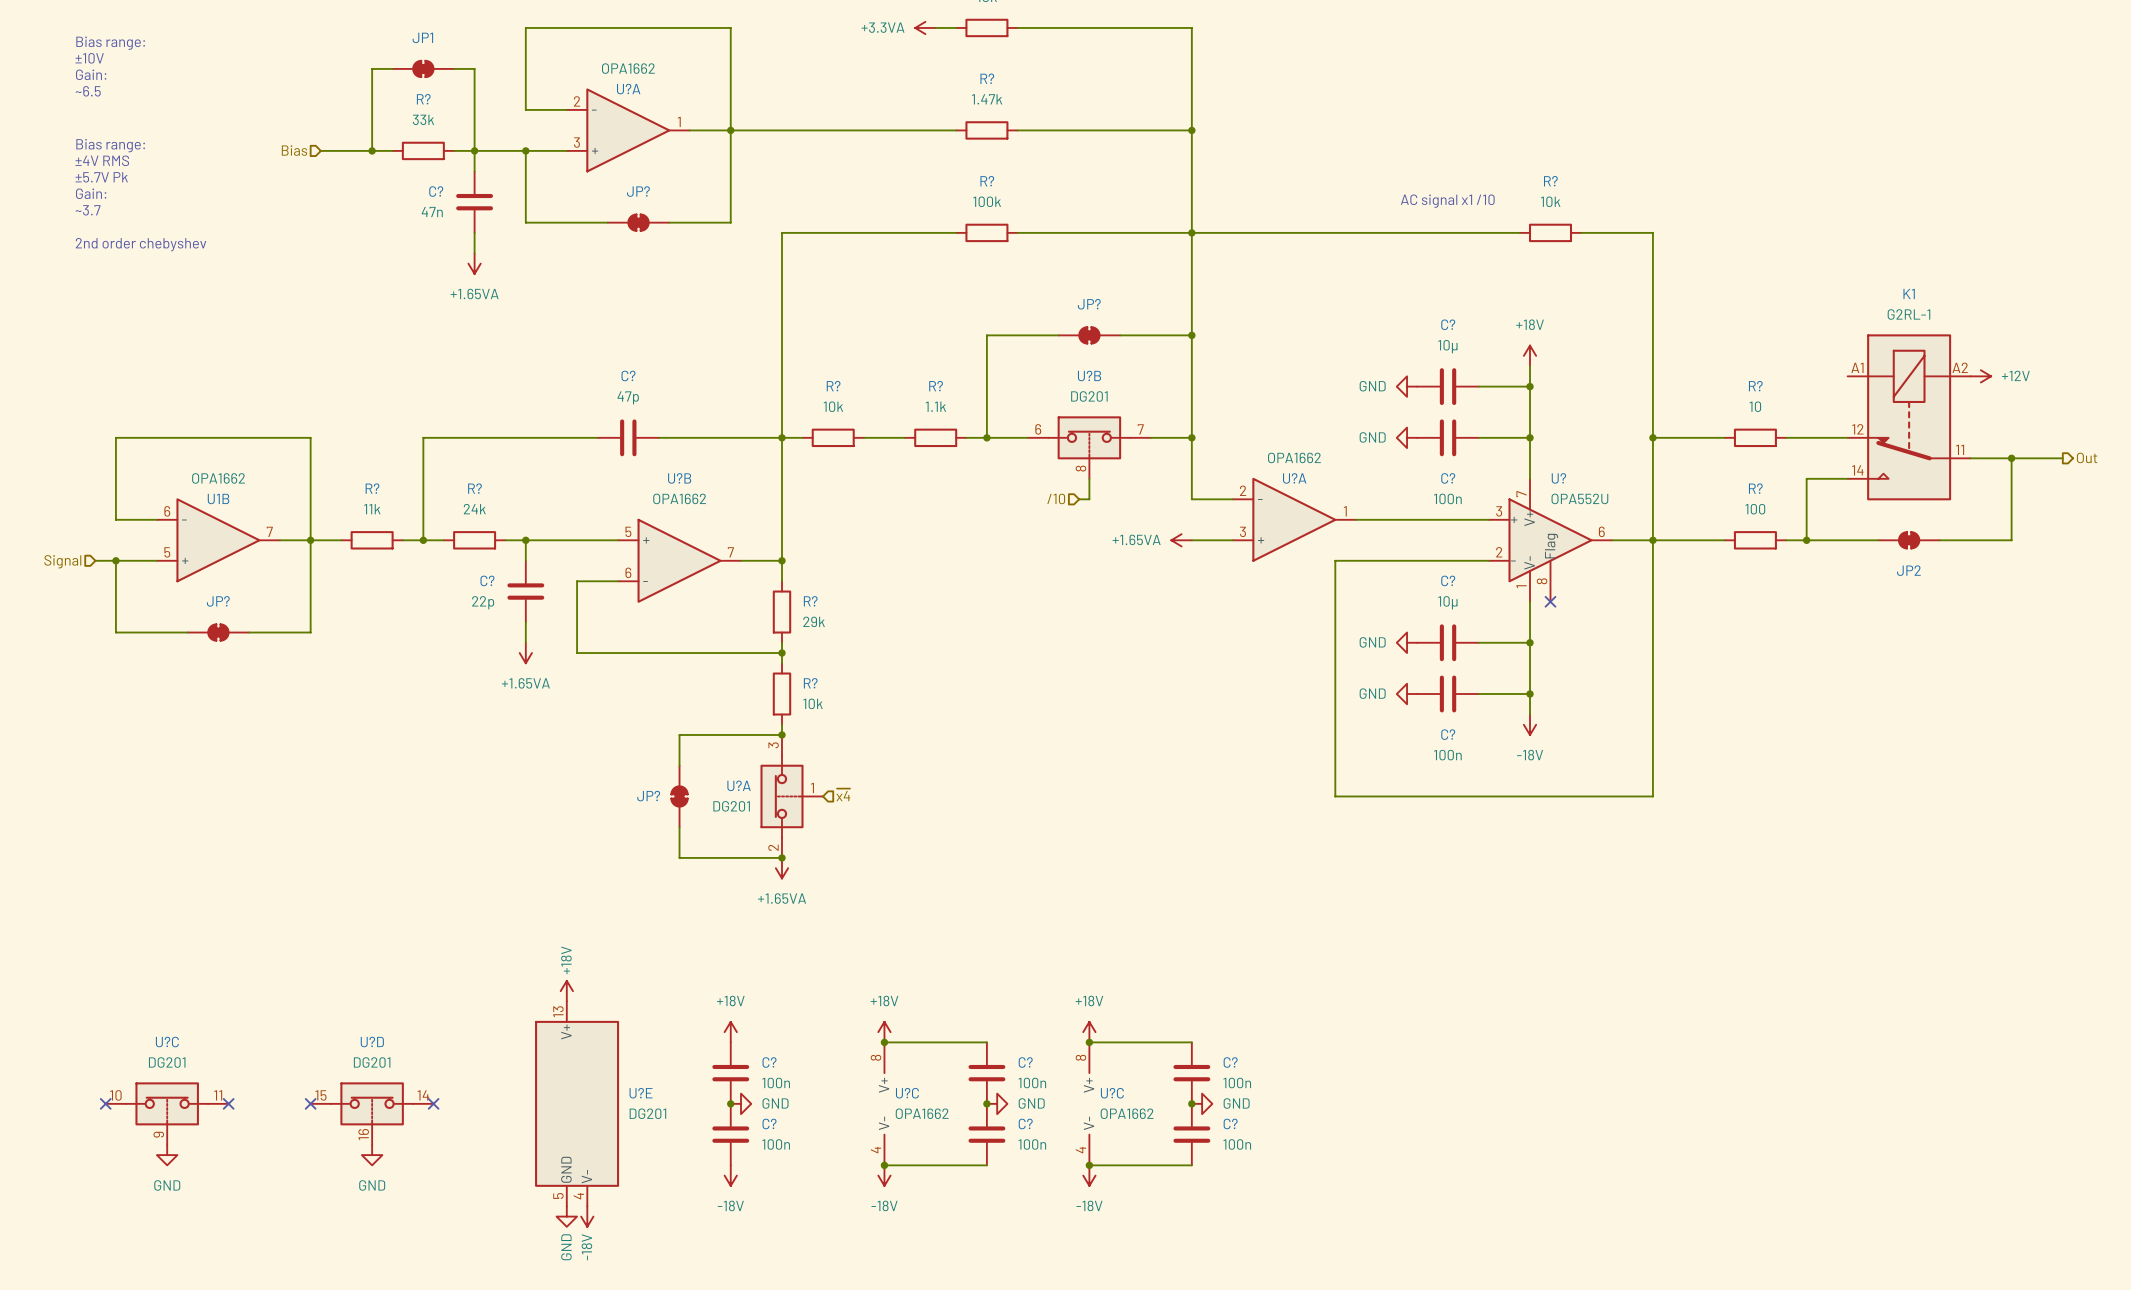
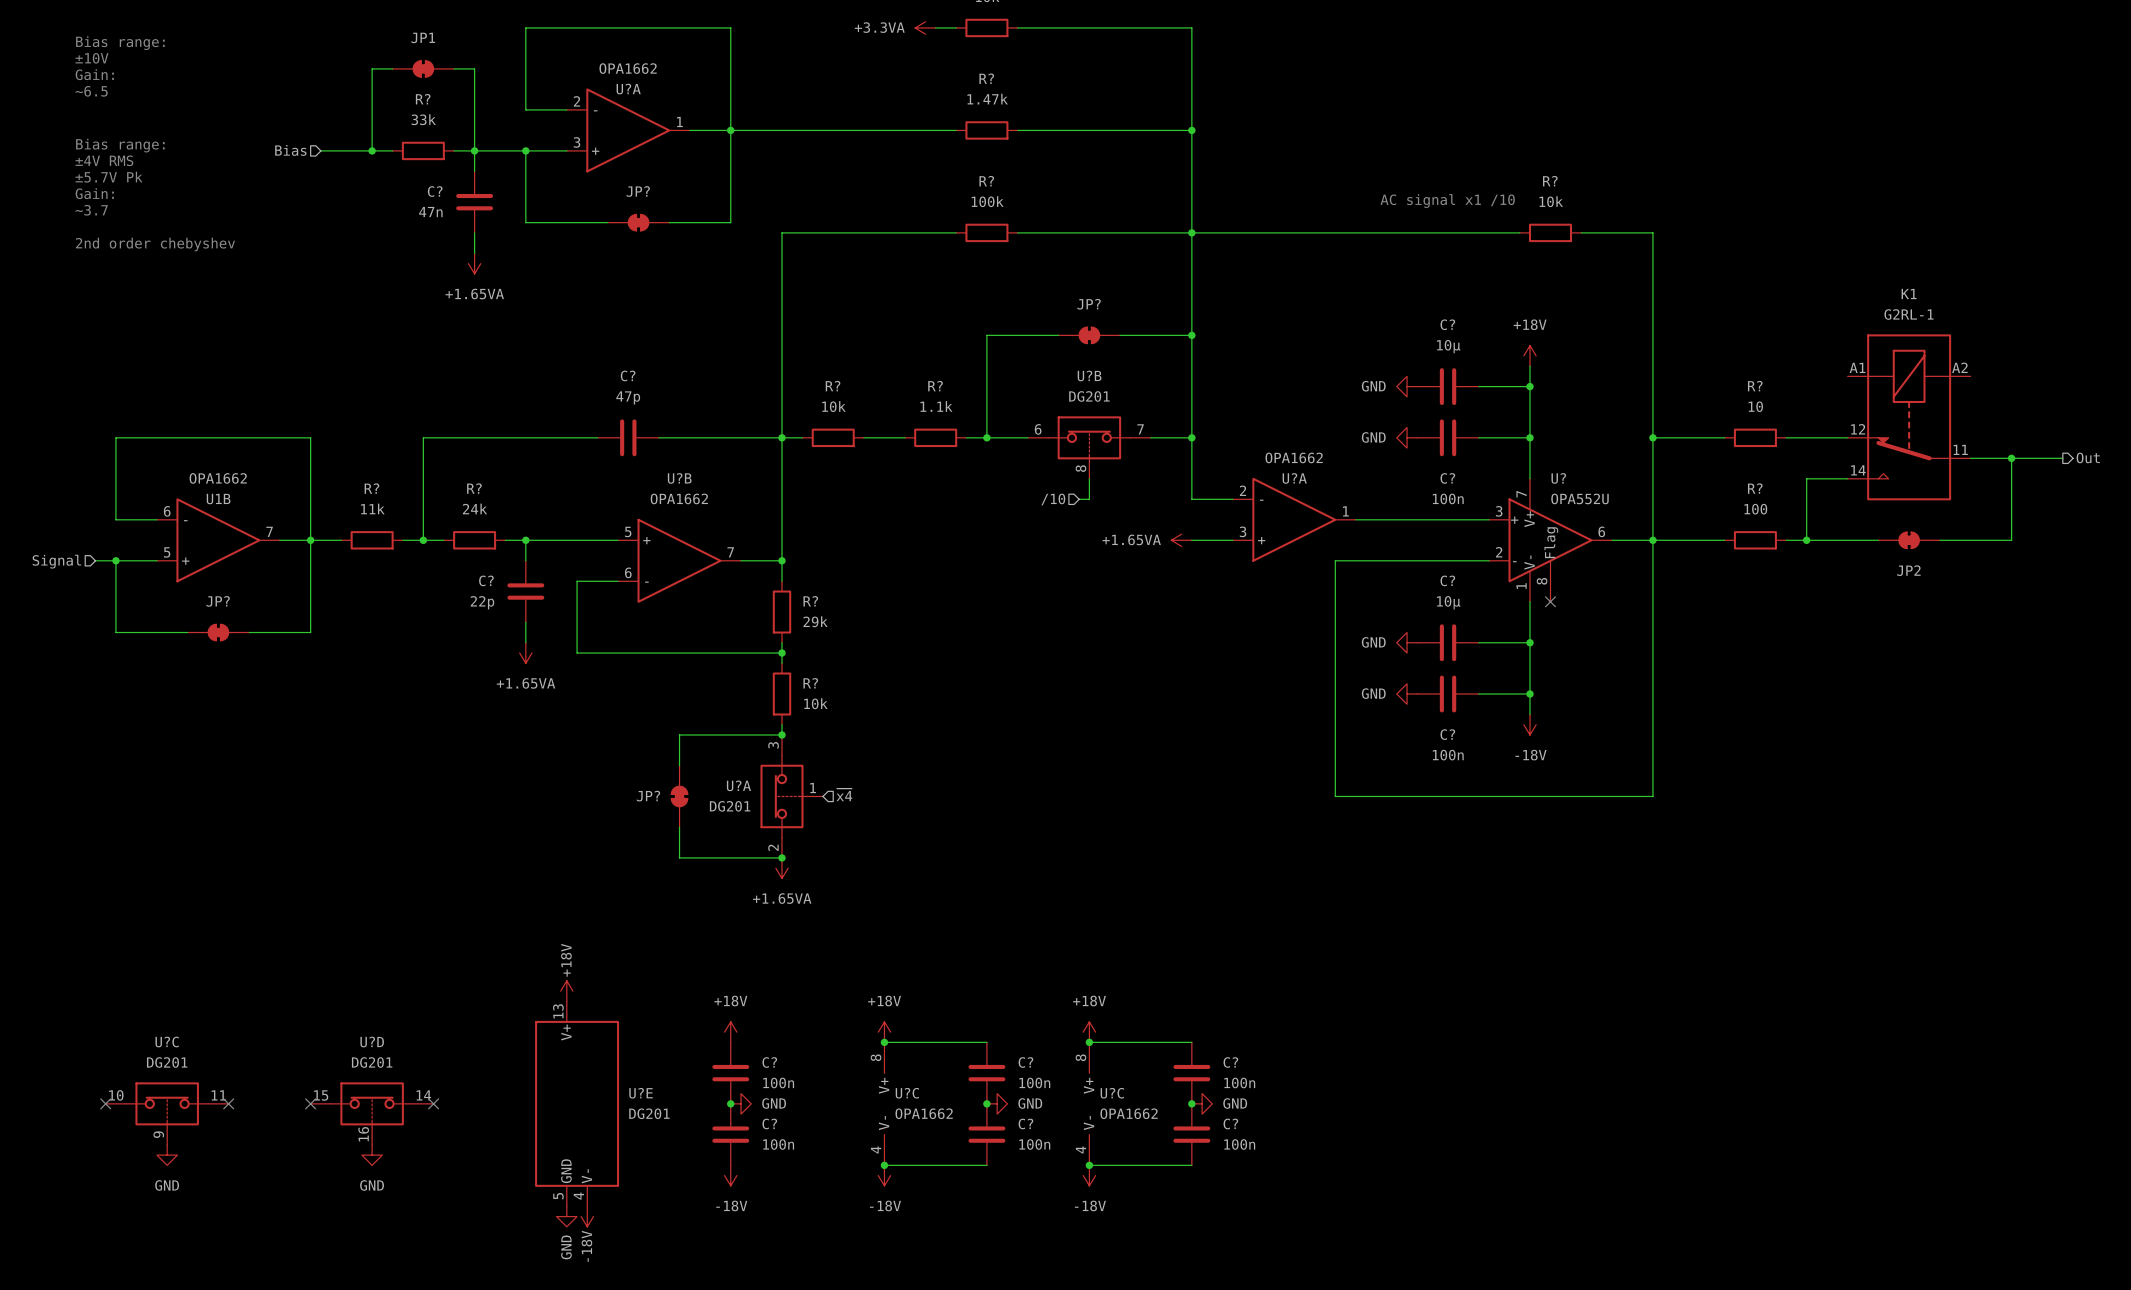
power symbol: +12V (1980, 376) -> none

